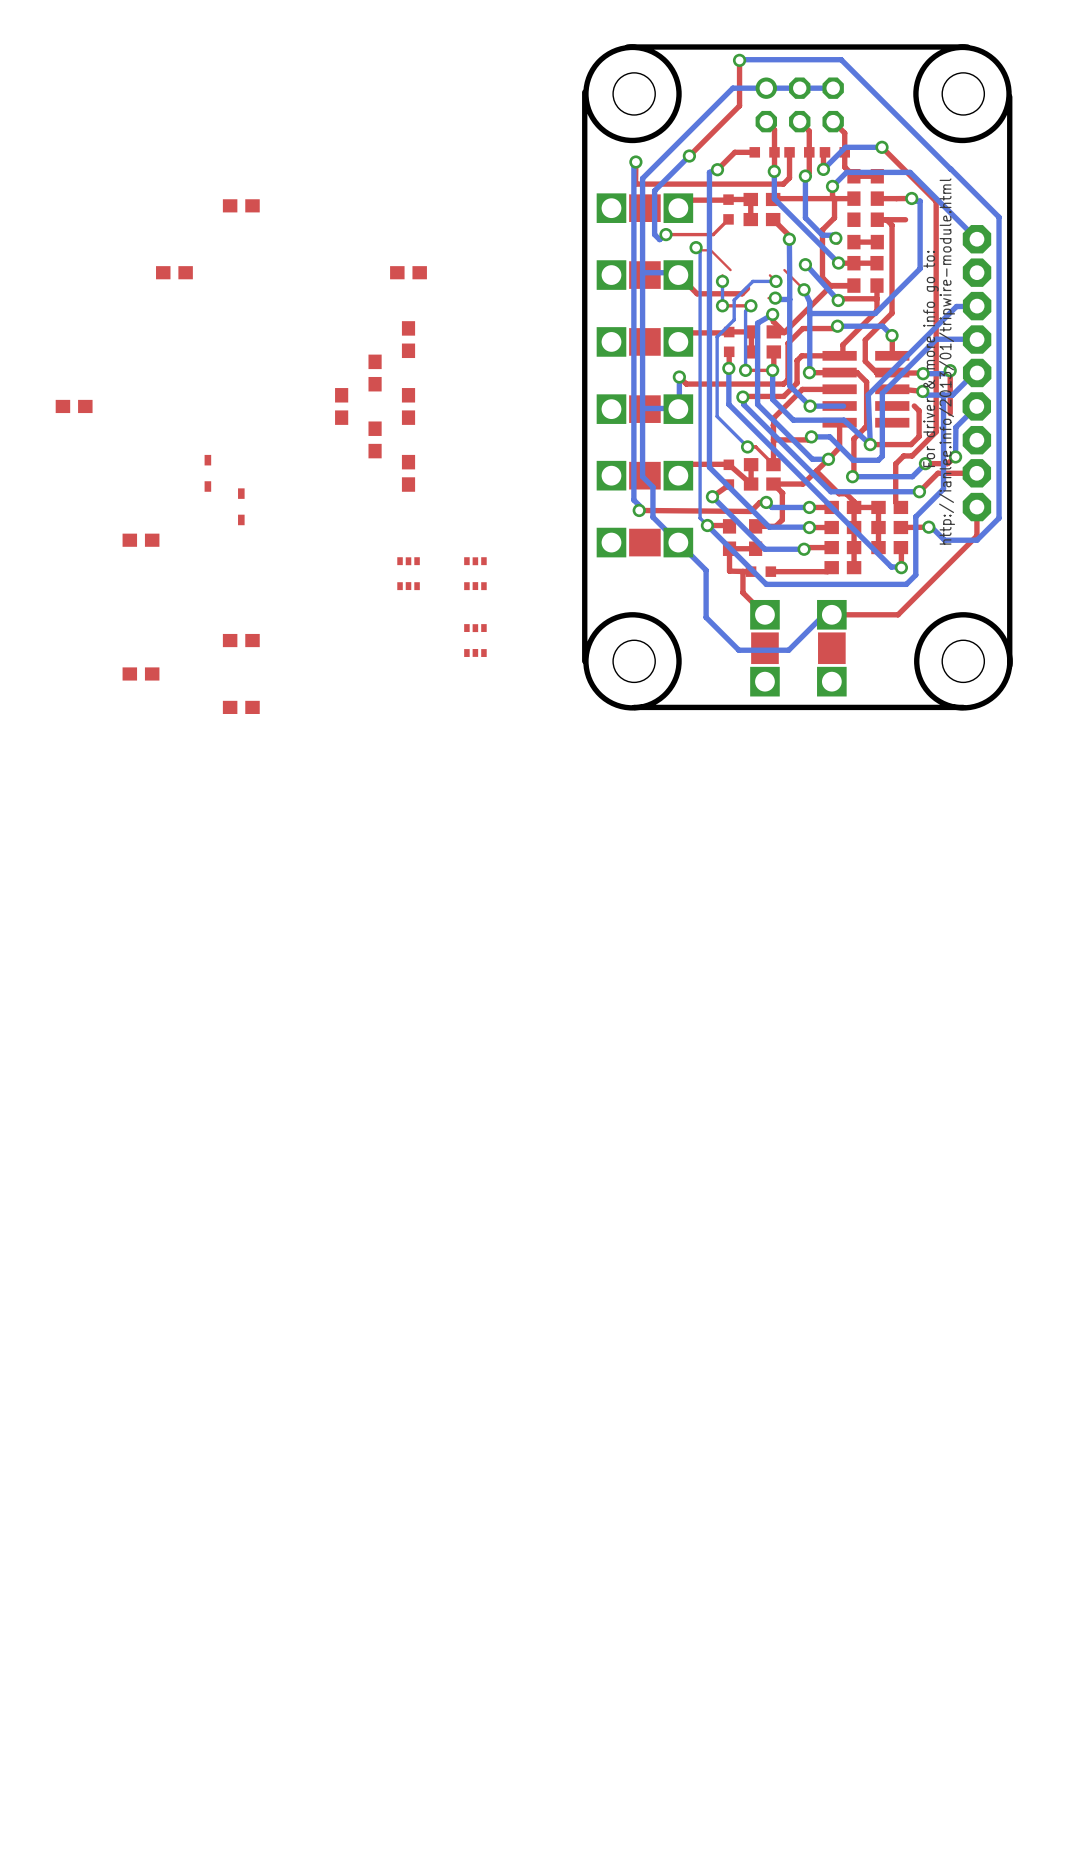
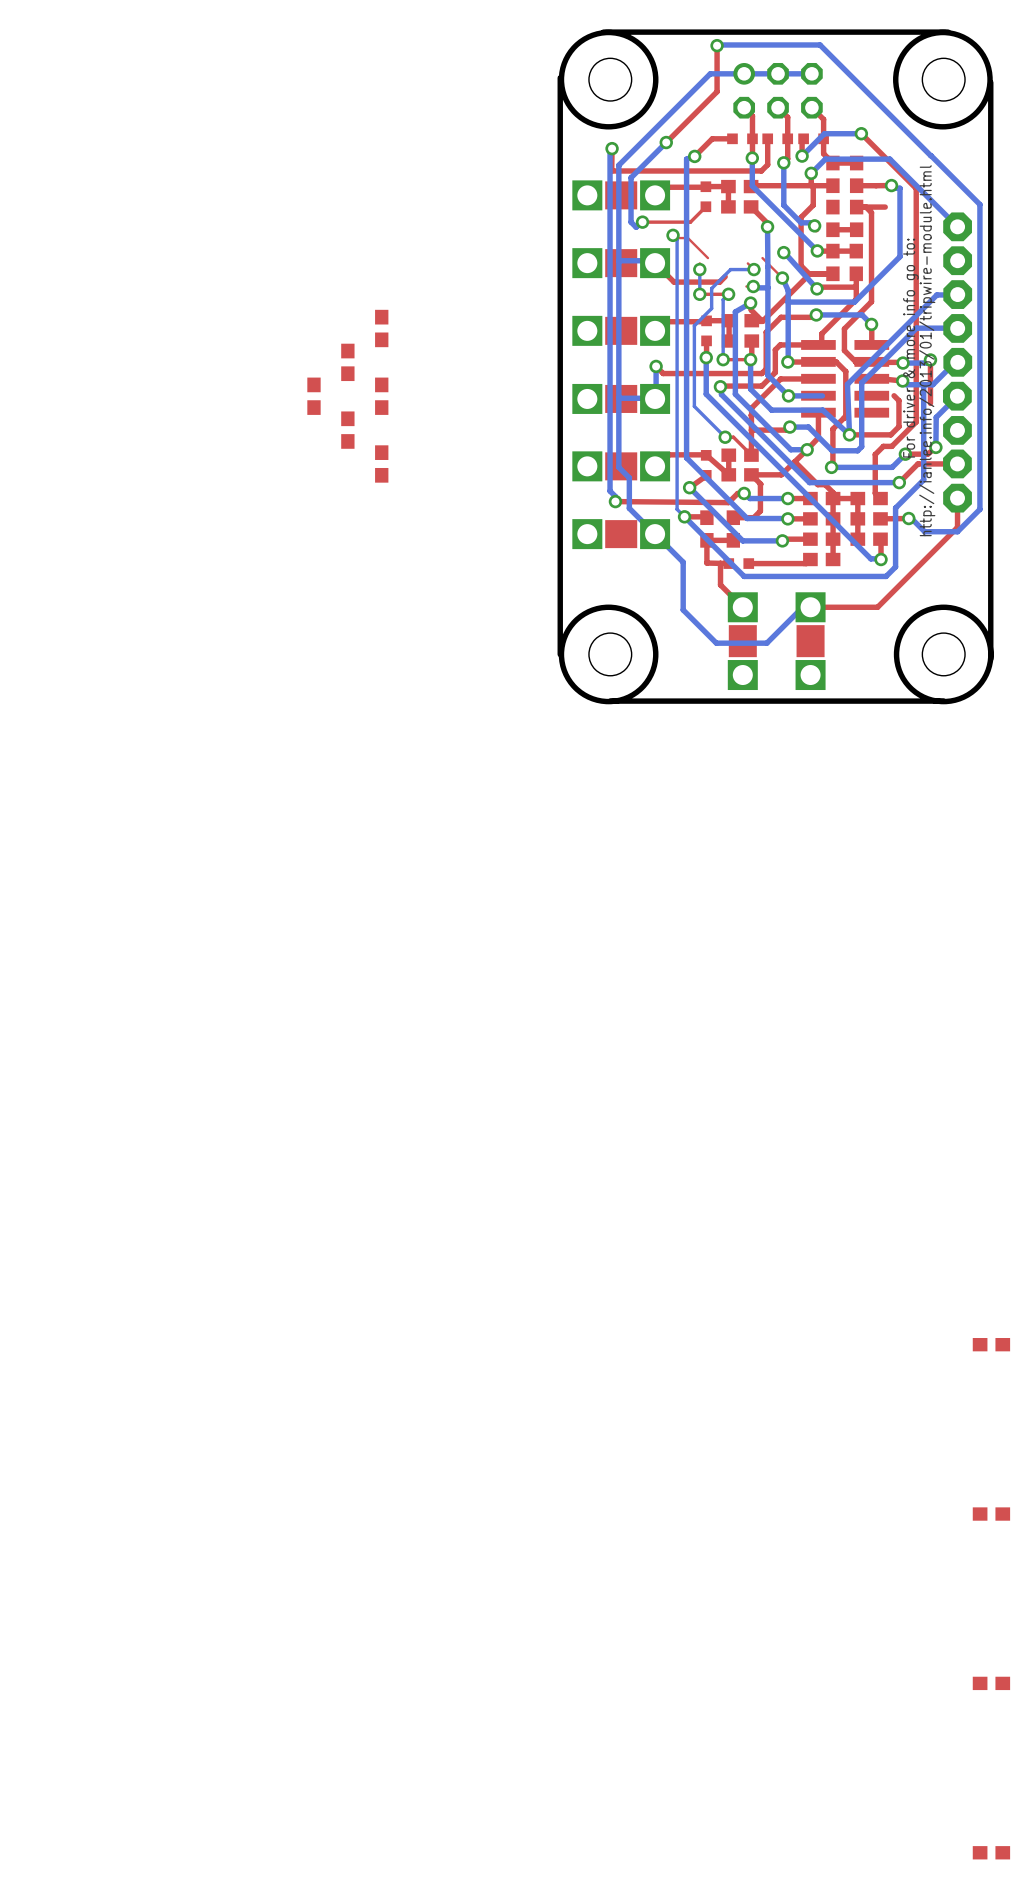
part: (241, 205) -> none
part: (174, 272) -> none
part: (408, 272) -> none
part: (74, 406) -> none
part: (207, 473) -> none
part: (241, 506) -> none
part: (141, 540) -> none
part: (408, 573) -> none
part: (475, 573) -> none
part: (241, 640) -> none
part: (475, 640) -> none
part: (141, 673) -> none
part: (241, 707) -> none
part: none -> (991, 1344)
part: none -> (991, 1514)
part: none -> (991, 1683)
part: none -> (991, 1852)

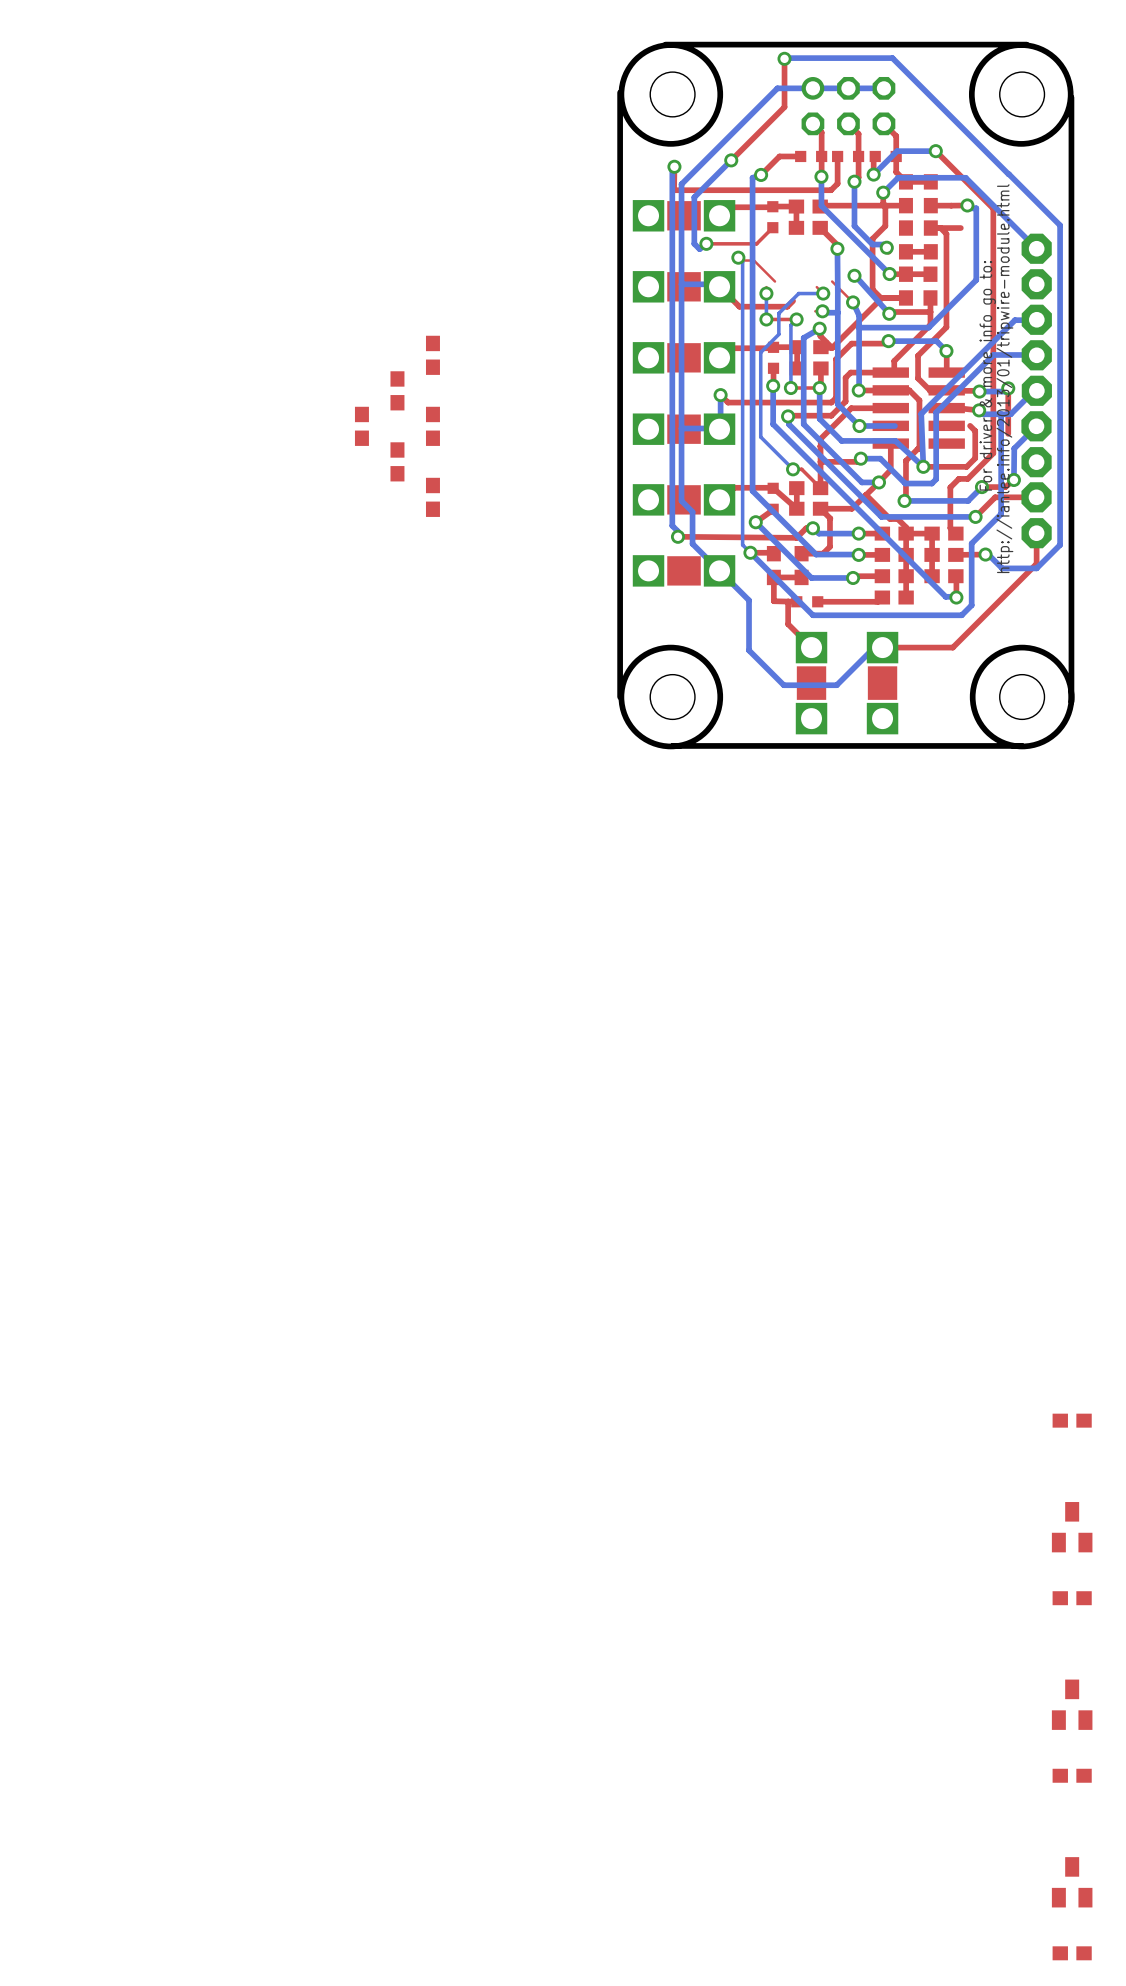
part: none -> (1072, 1527)
part: none -> (1072, 1704)
part: none -> (1072, 1882)

